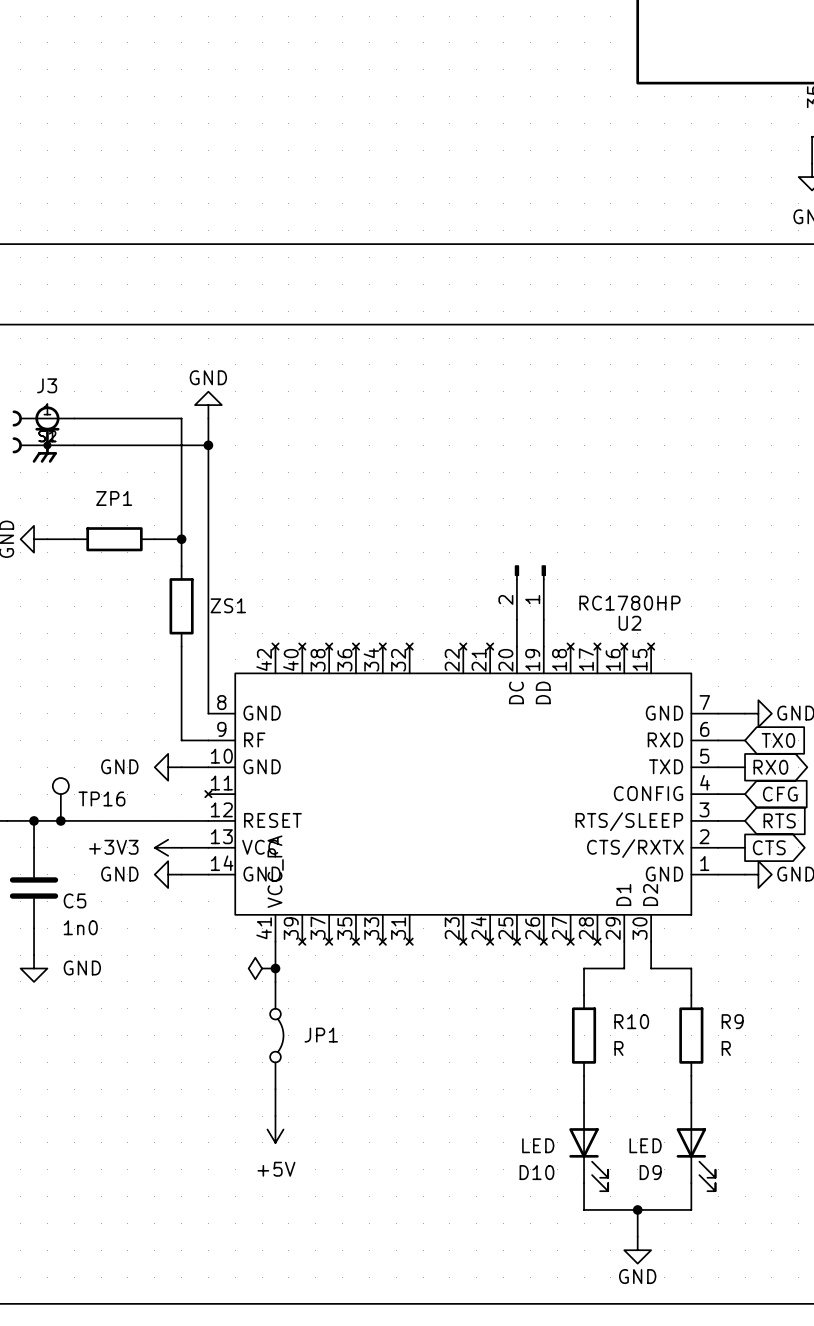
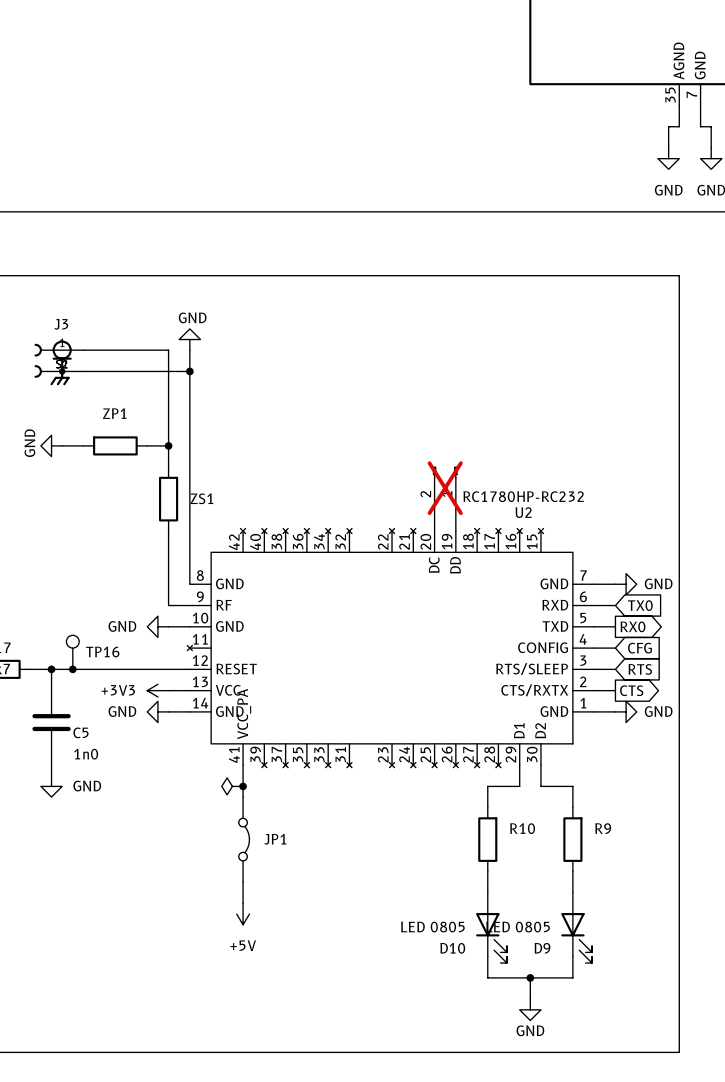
part do-not-place cross: none -> (445, 488)
U2 value: RC1780HP (629, 603) -> RC1780HP-RC232 (523, 496)
R10 value: R (618, 1048) -> none
R9 value: R (726, 1048) -> none
D10 value: LED (538, 1145) -> LED 0805 (432, 927)
D9 value: LED (645, 1145) -> LED 0805 (518, 927)

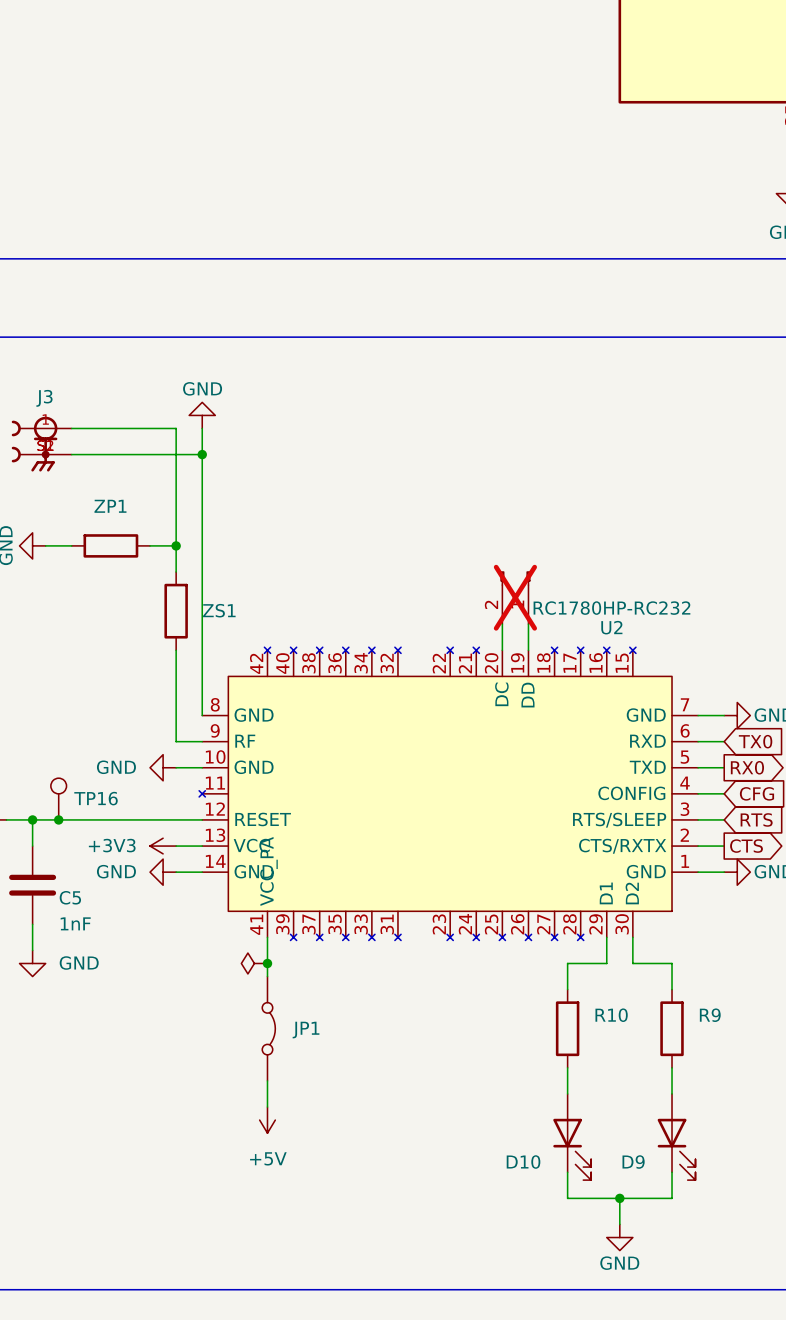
C5 value: 1n0 (86, 754) -> 1nF (75, 923)
D10 value: LED 0805 (432, 927) -> none
D9 value: LED 0805 (518, 927) -> none

